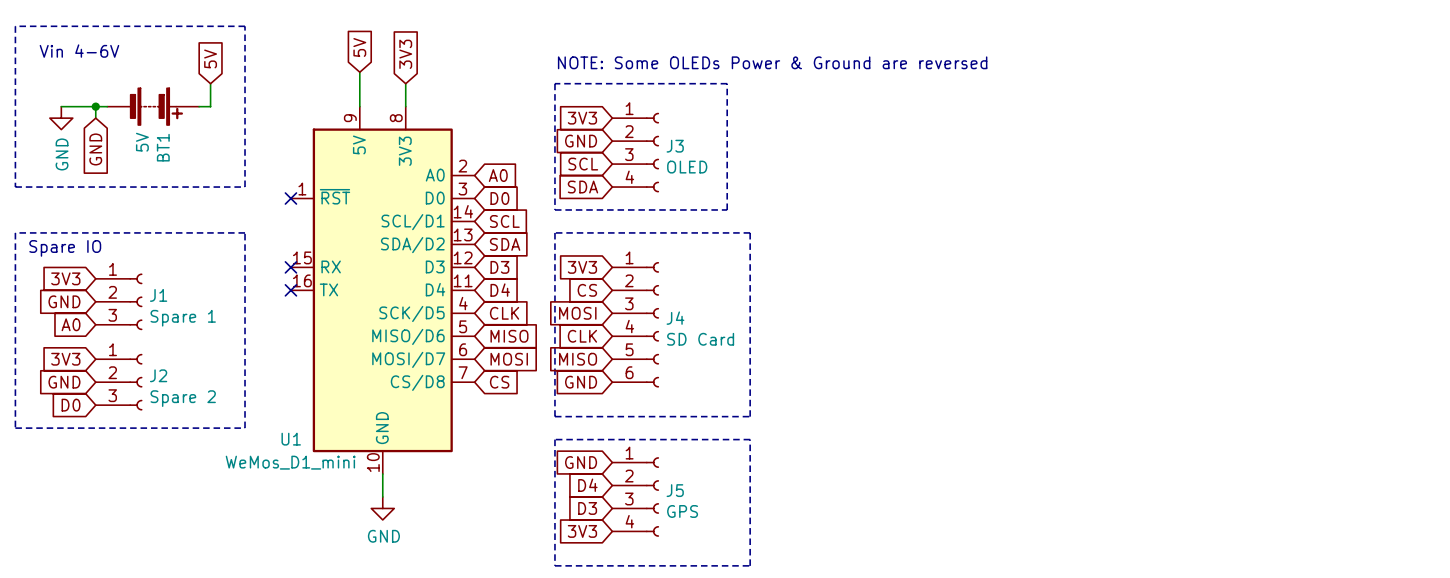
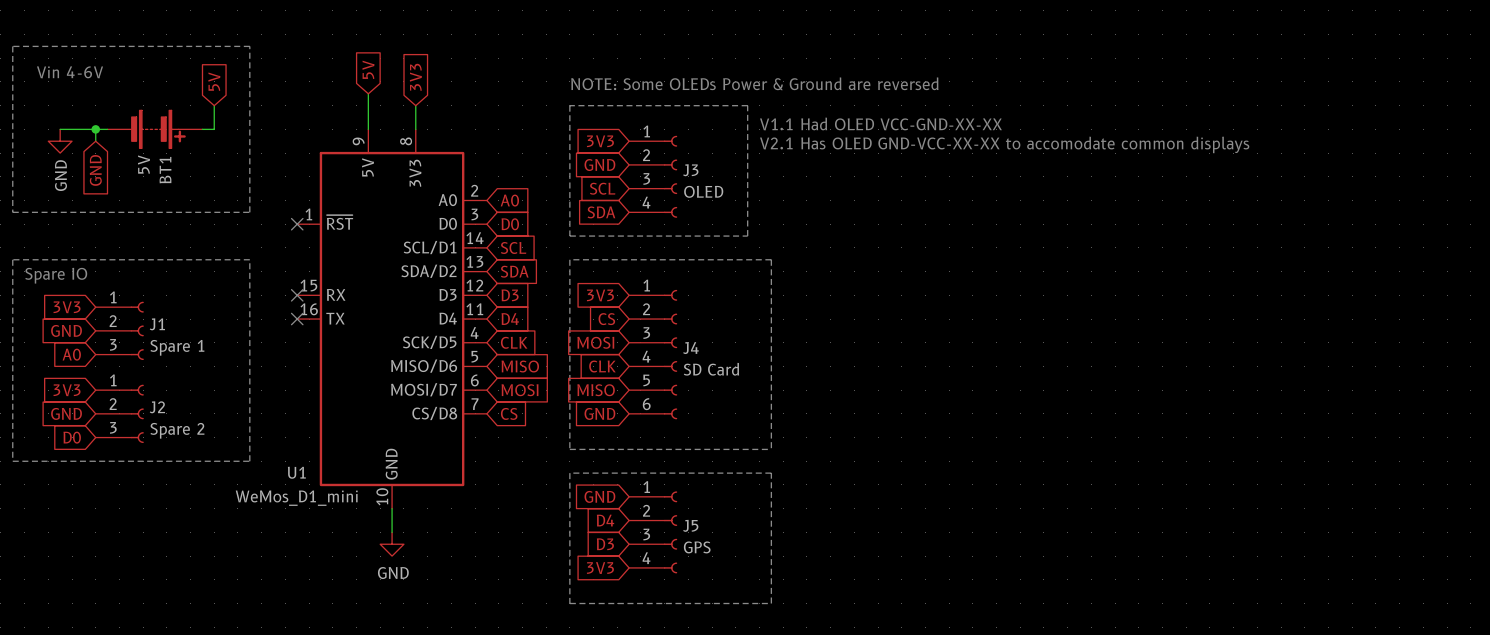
text: none -> V1.1 Had OLED VCC-GND-XX-XX (880, 123)
text: none -> V2.1 Has OLED GND-VCC-XX-XX to accomodate common displays (1004, 144)

